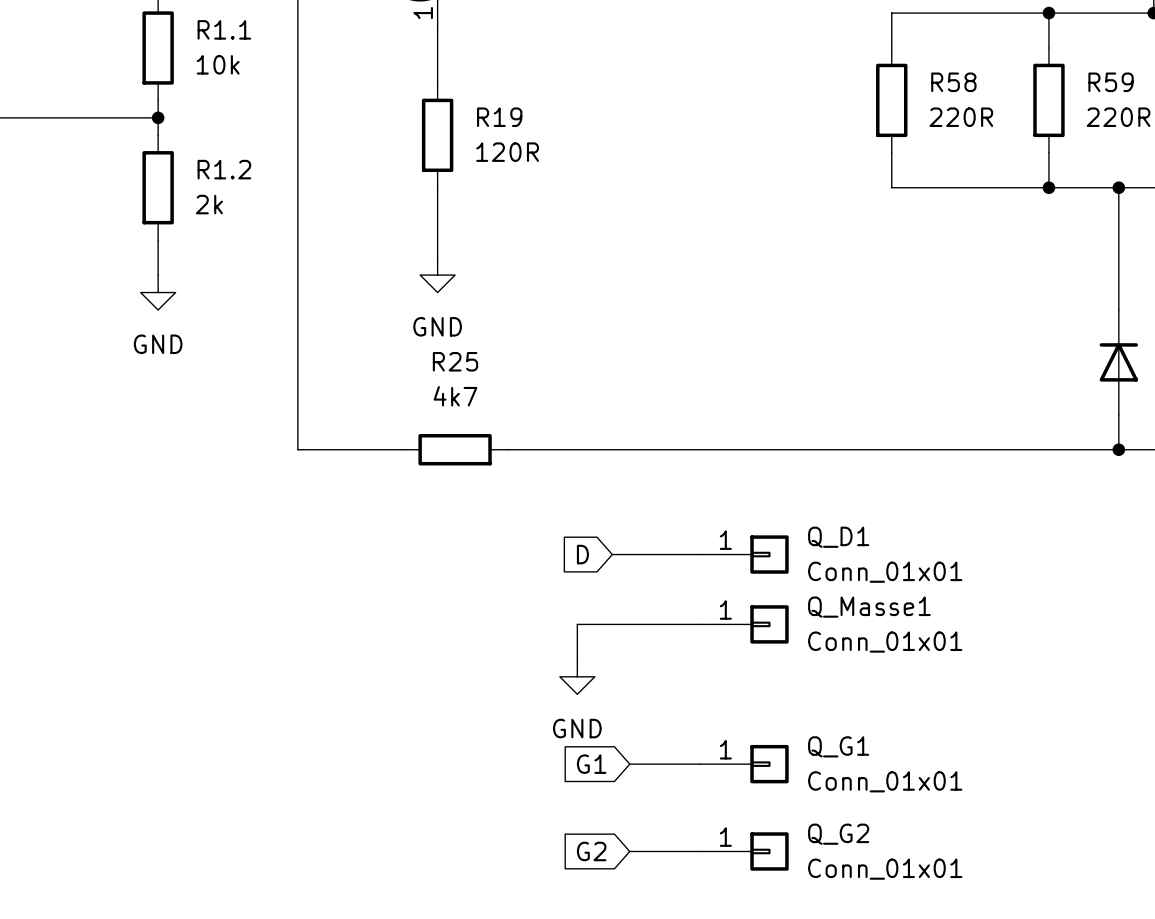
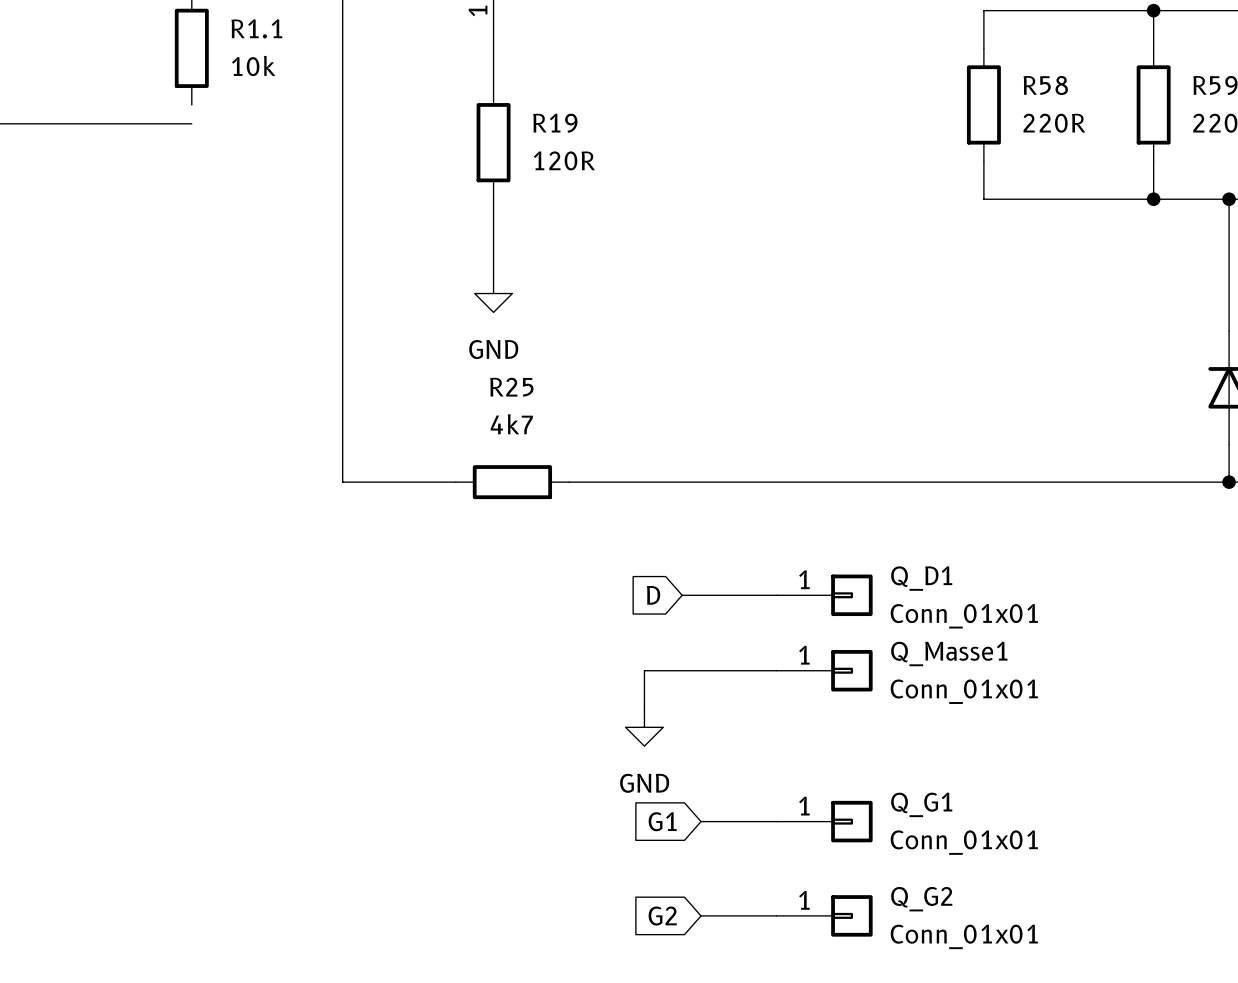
wire: (158, 100) (158, 135) -> none
junction: (158, 117) -> none
R1.2: 2k (158, 187) -> none
wire: (158, 240) (158, 275) -> none
power symbol: GND (158, 292) -> none

